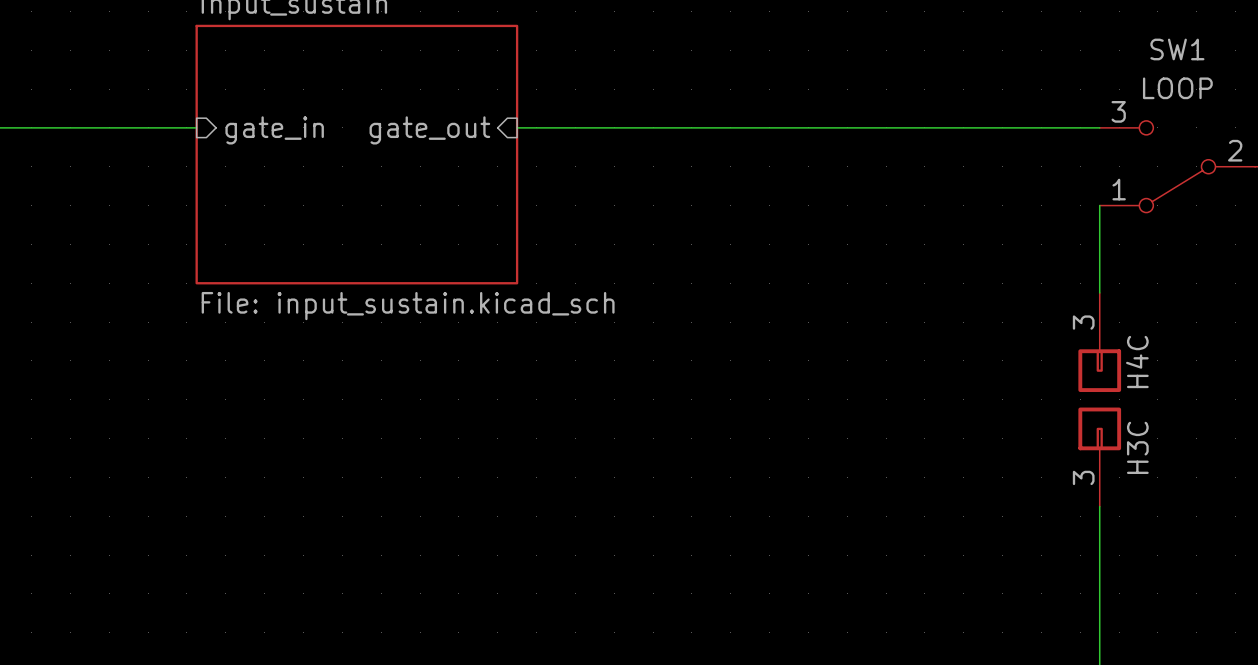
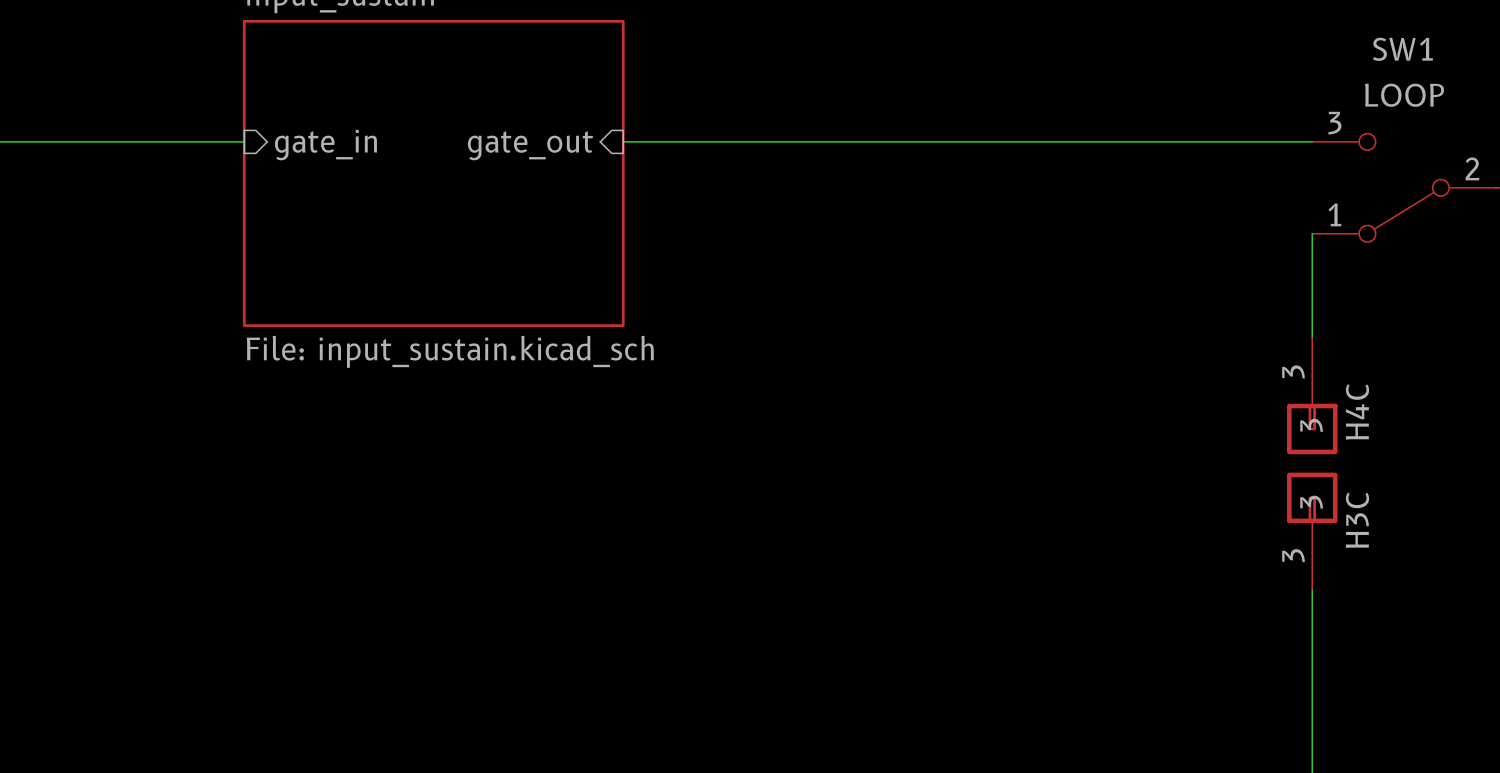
H4C pin name: none -> 3 (1311, 425)
H3C pin name: none -> 3 (1311, 502)

